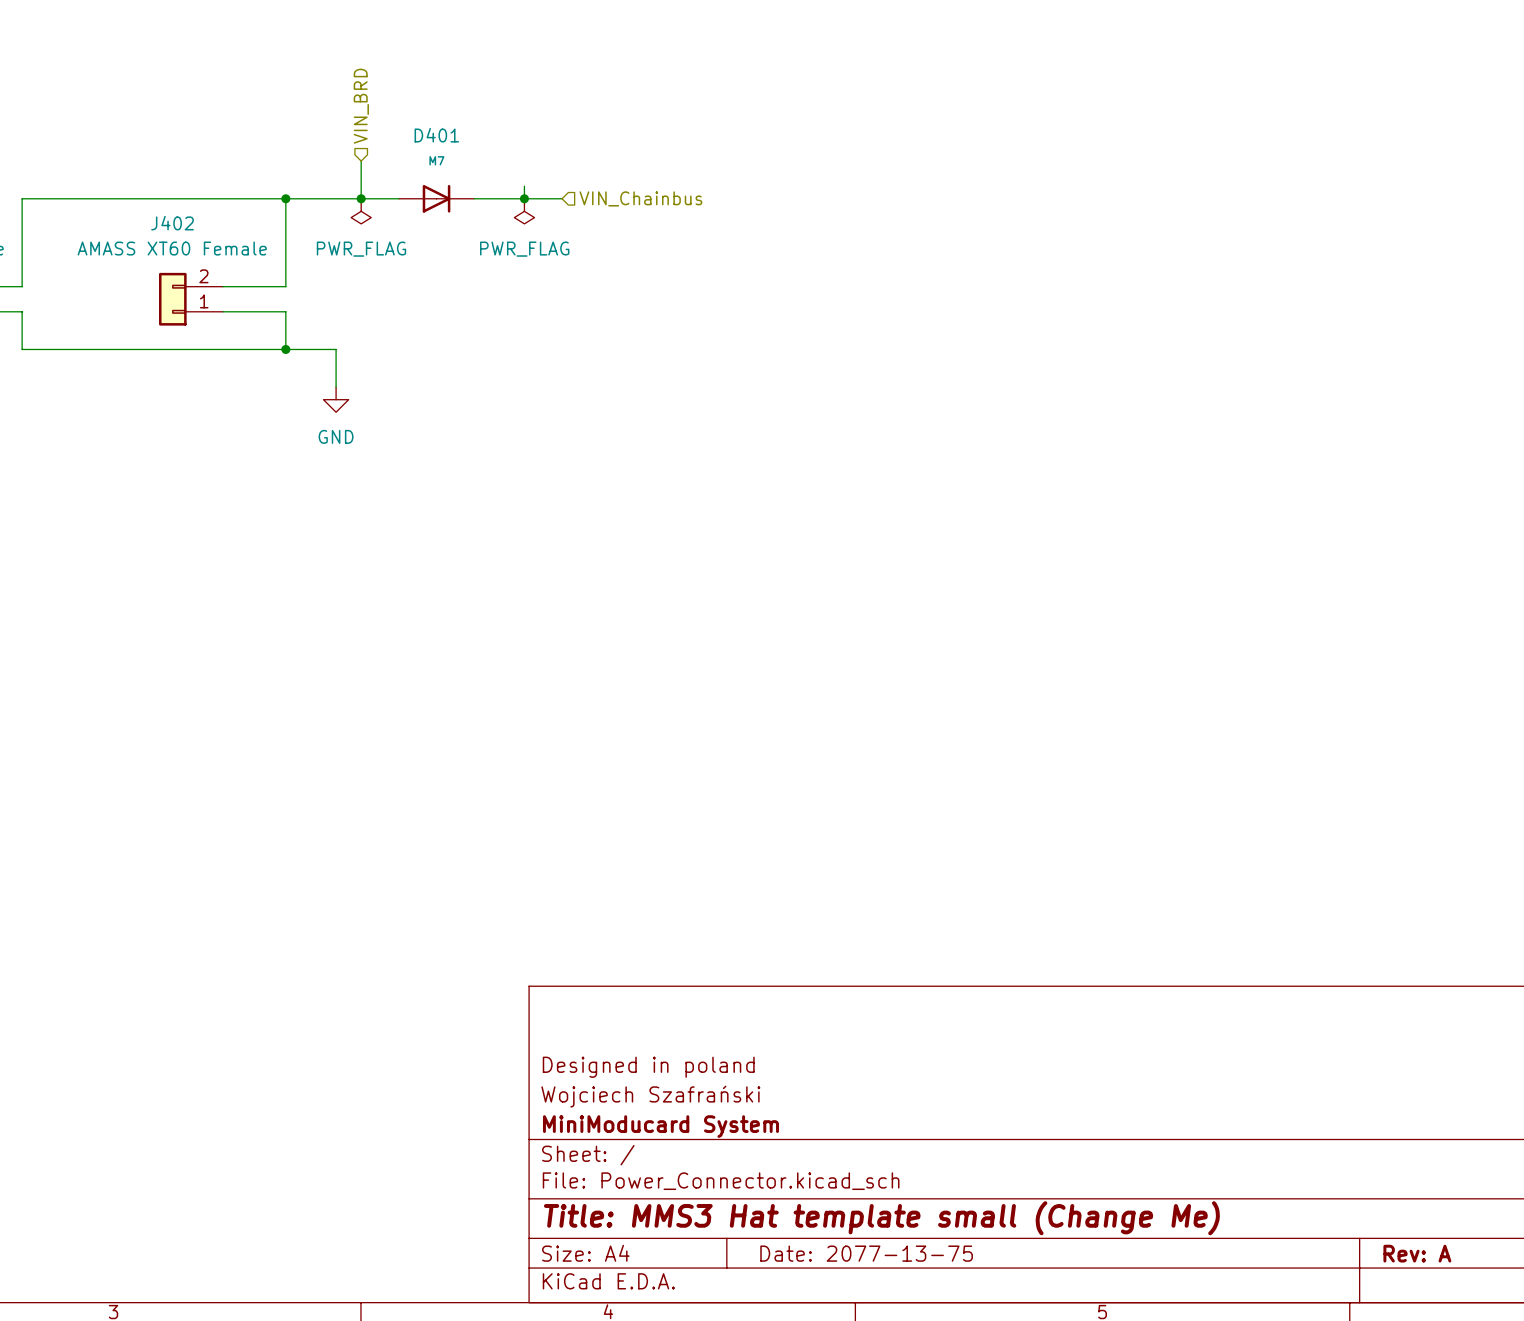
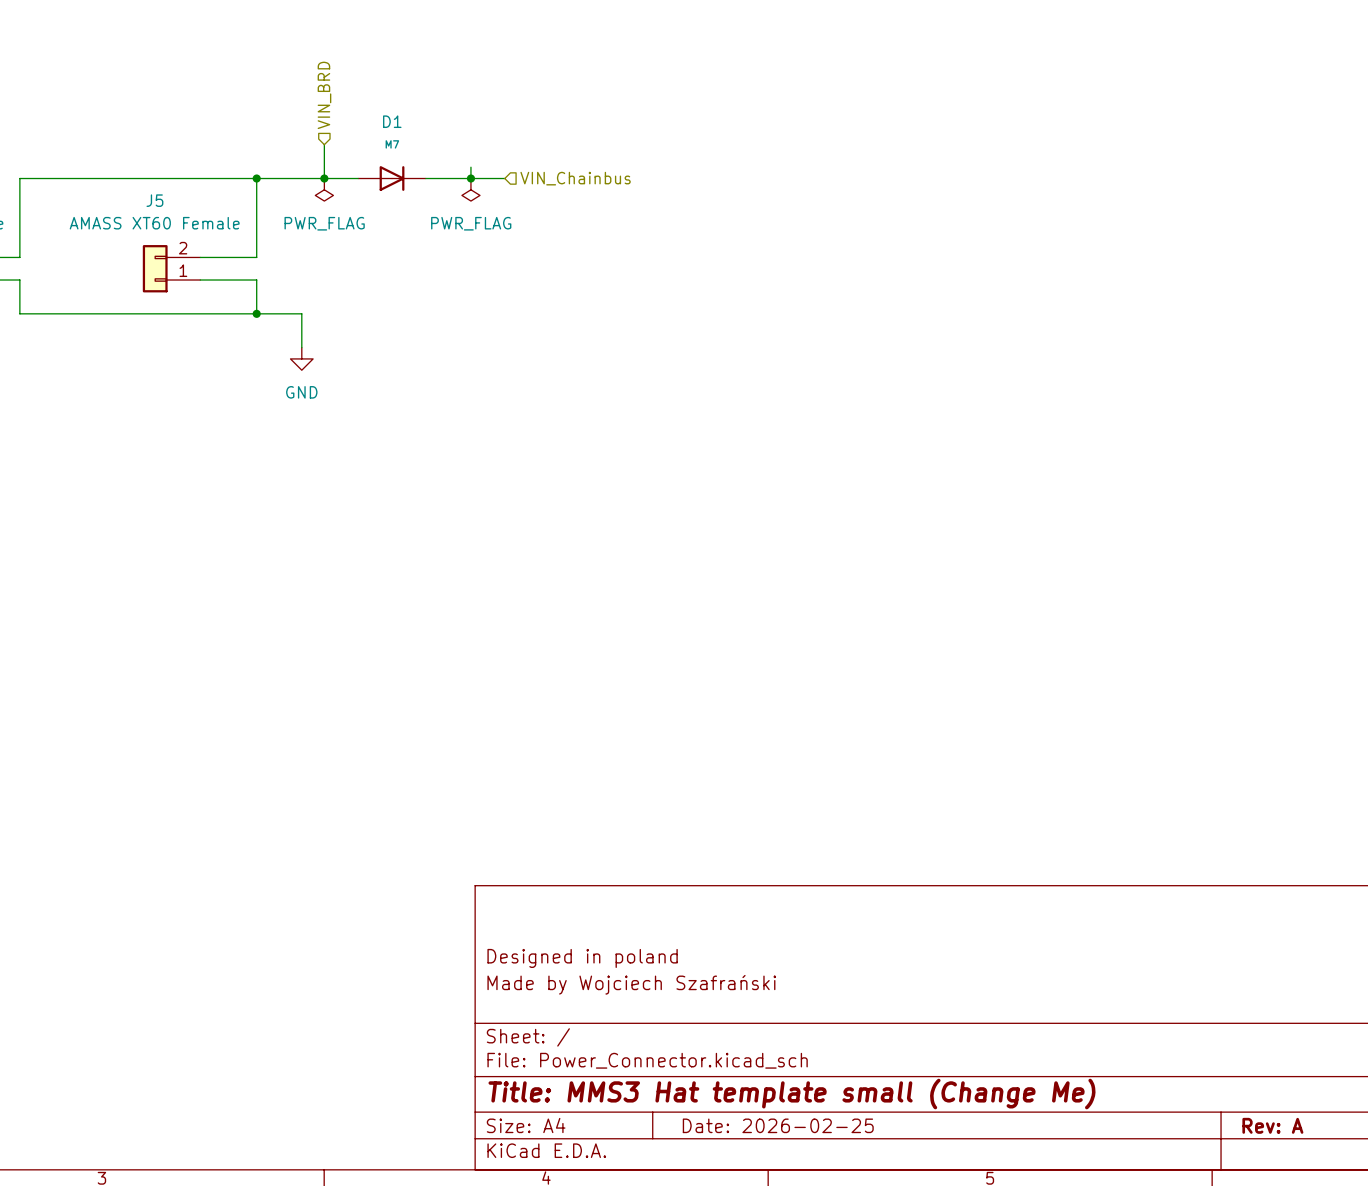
D401 name: D401 (436, 135) -> D1 (392, 121)
J402 name: J402 (172, 223) -> J5 (154, 200)
title block: Wojciech Szafrański (650, 1096) -> Made by Wojciech Szafrański (631, 984)
title block: MiniModucard System (660, 1126) -> none
title block: Date: 2077-13-75 (866, 1253) -> Date: 2026-02-25 (778, 1125)

